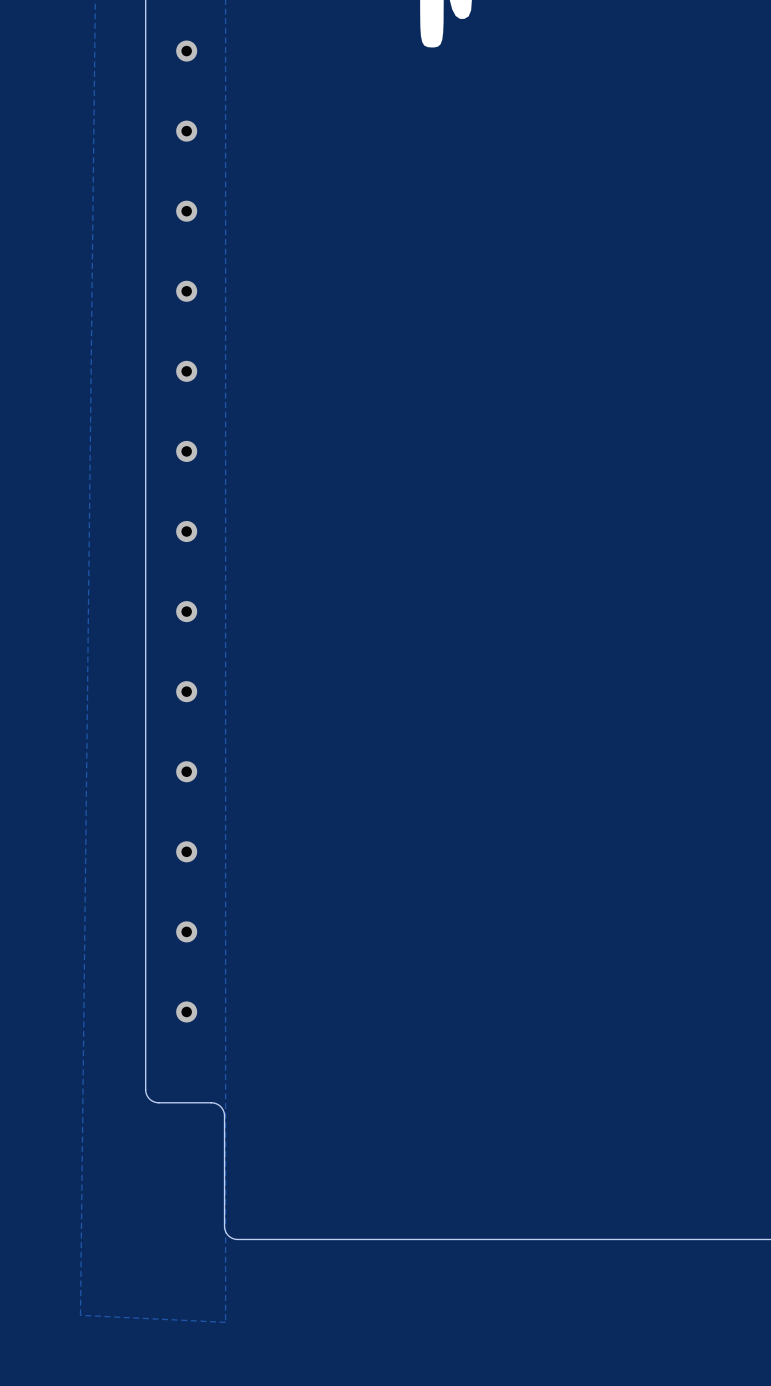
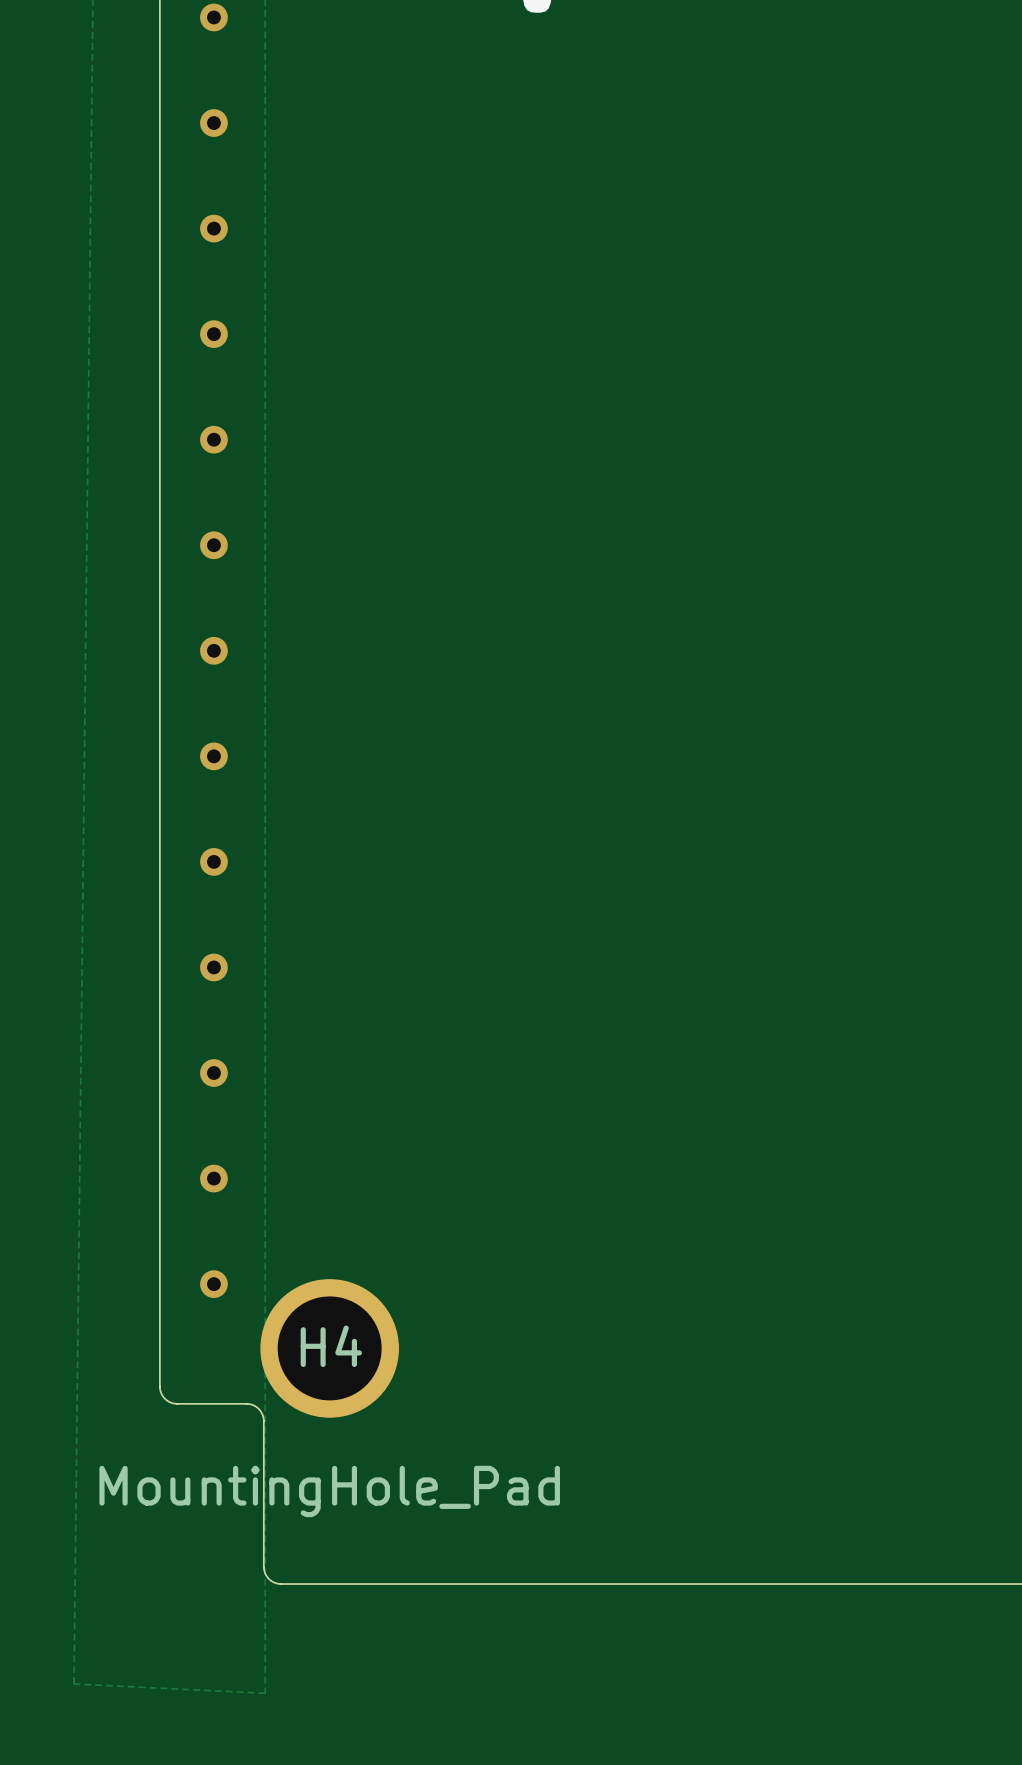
H4: none -> MountingHole_Pad (329, 1348)

